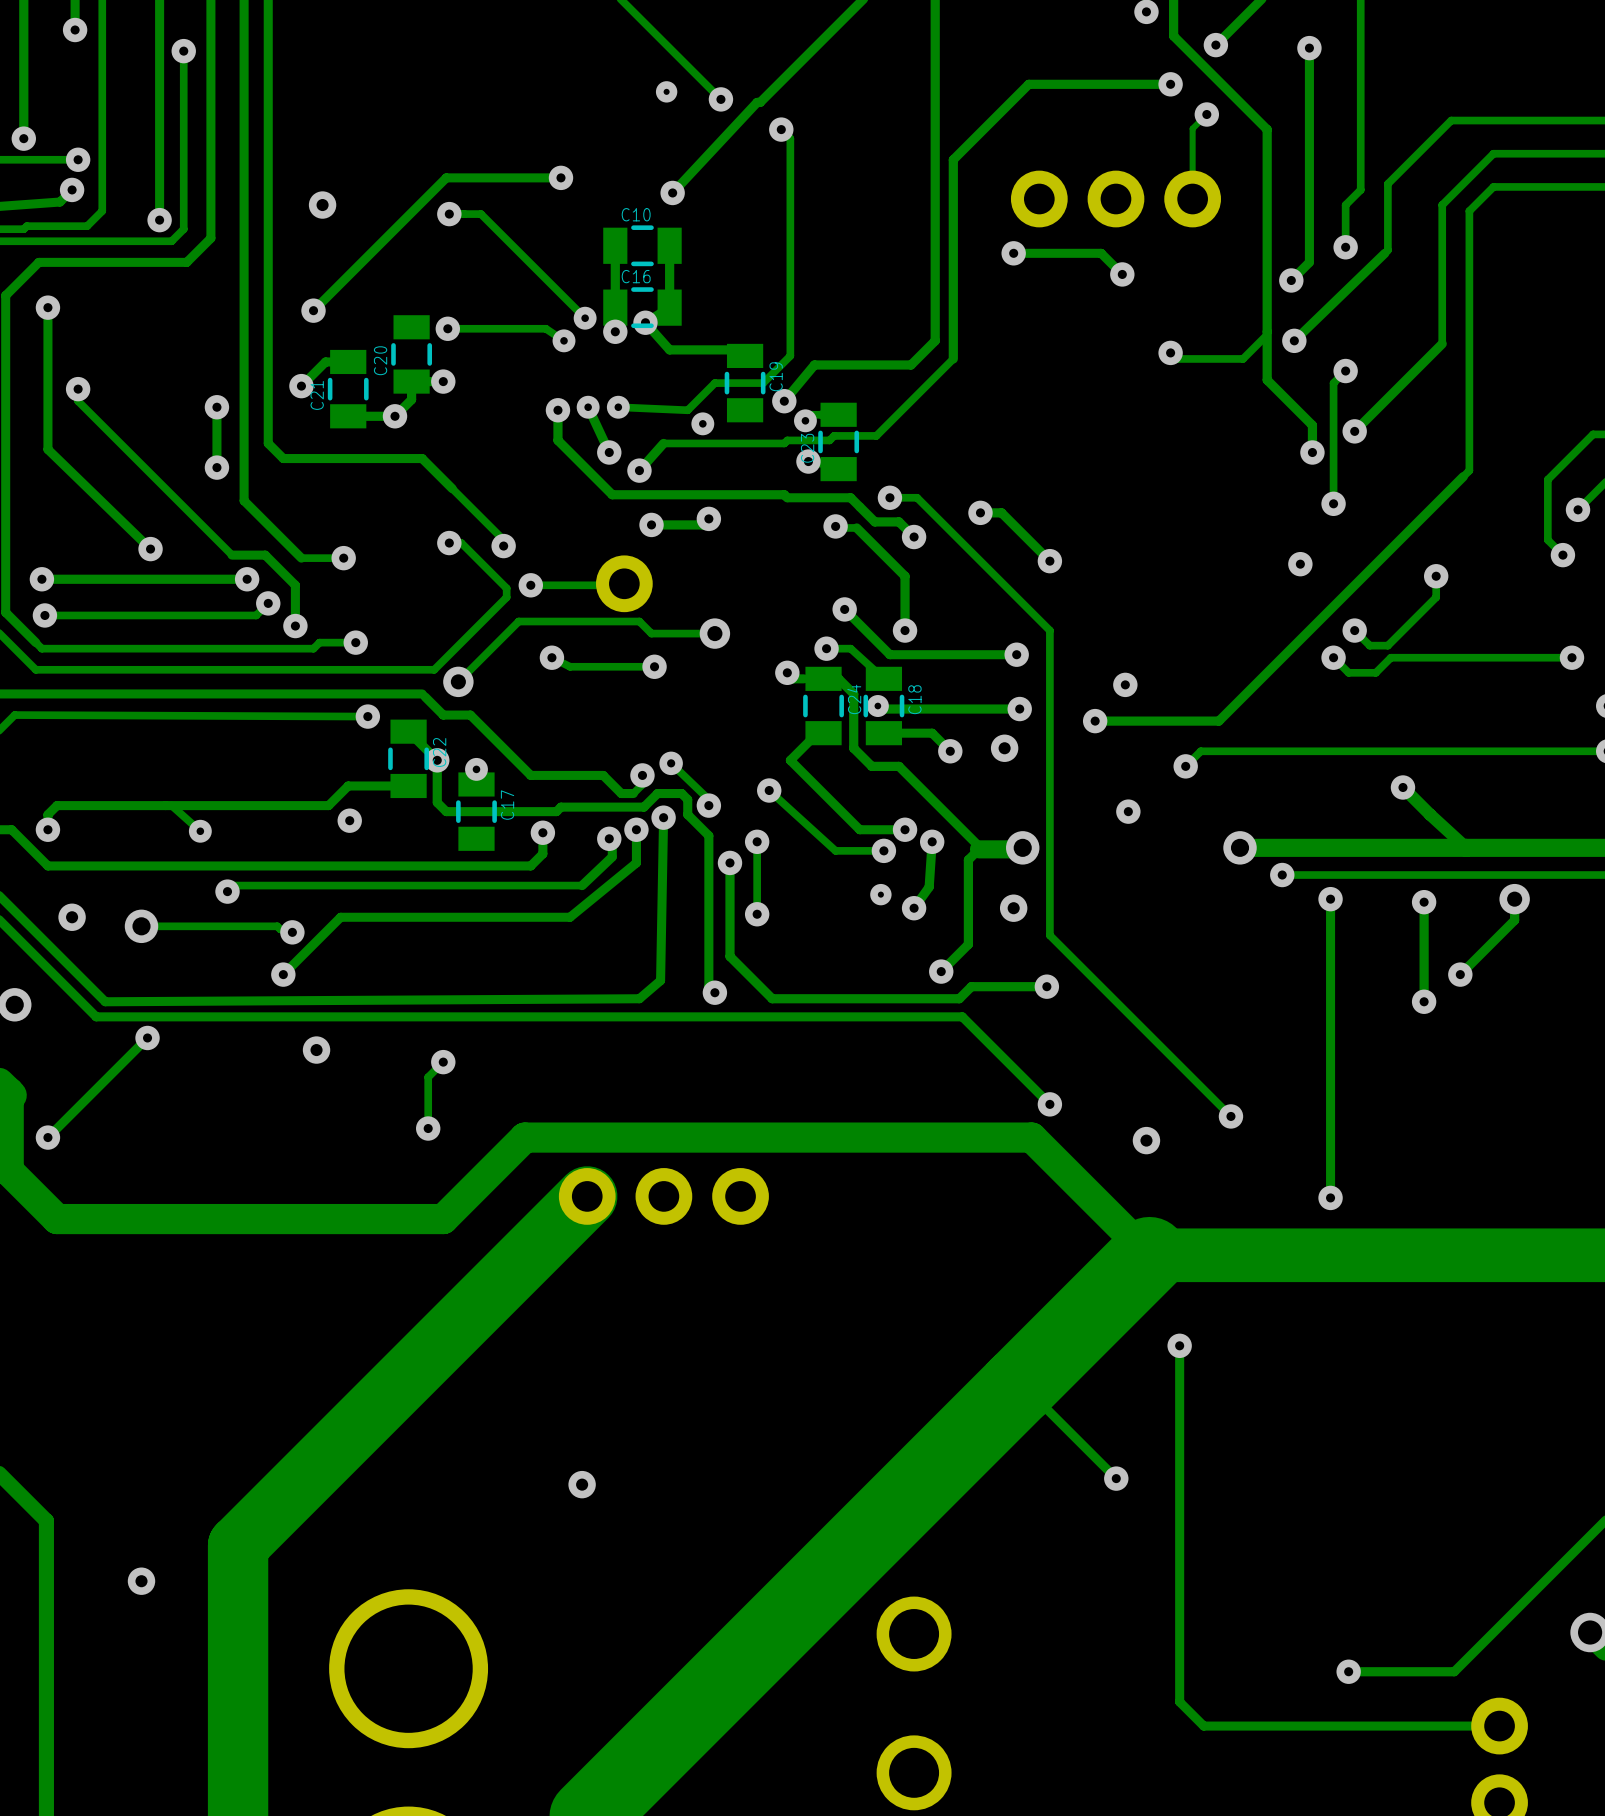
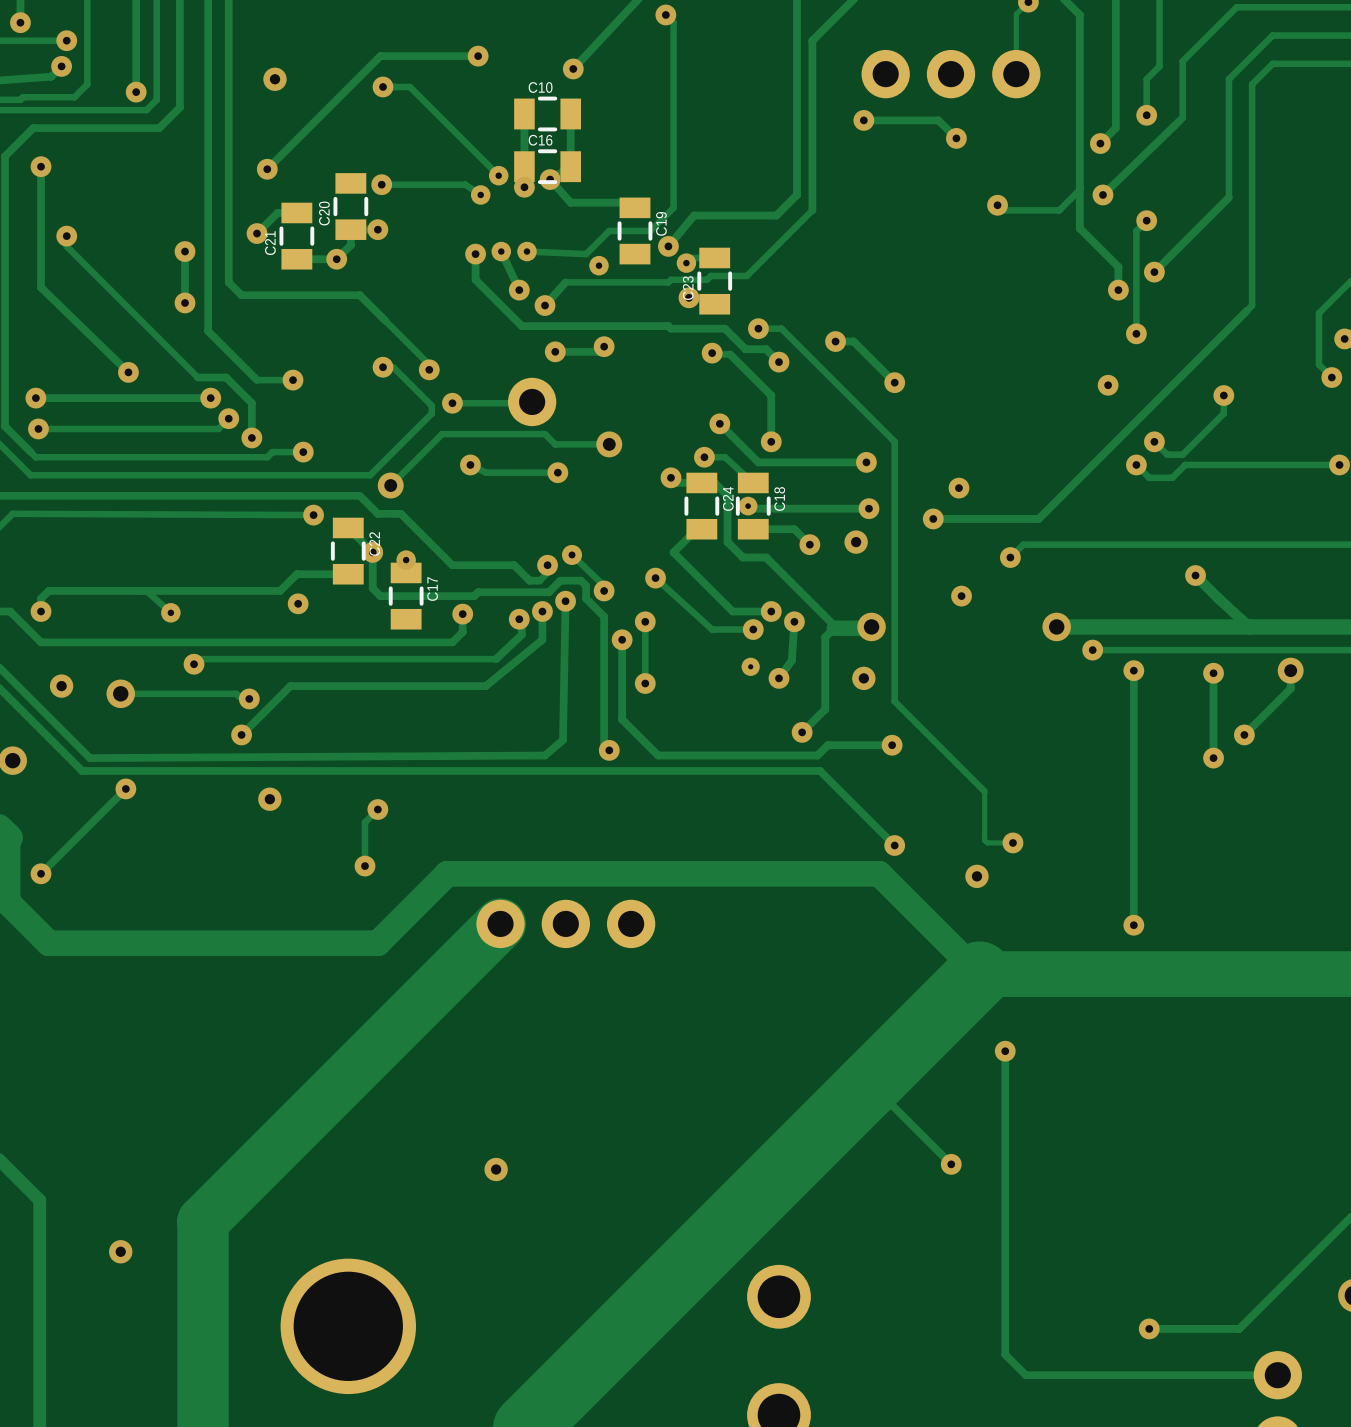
track: (1155, 1041) (1230, 1116) -> (984, 791) (984, 840) (987, 842) (1012, 842)
via position: (1230, 1116) -> (1012, 842)

